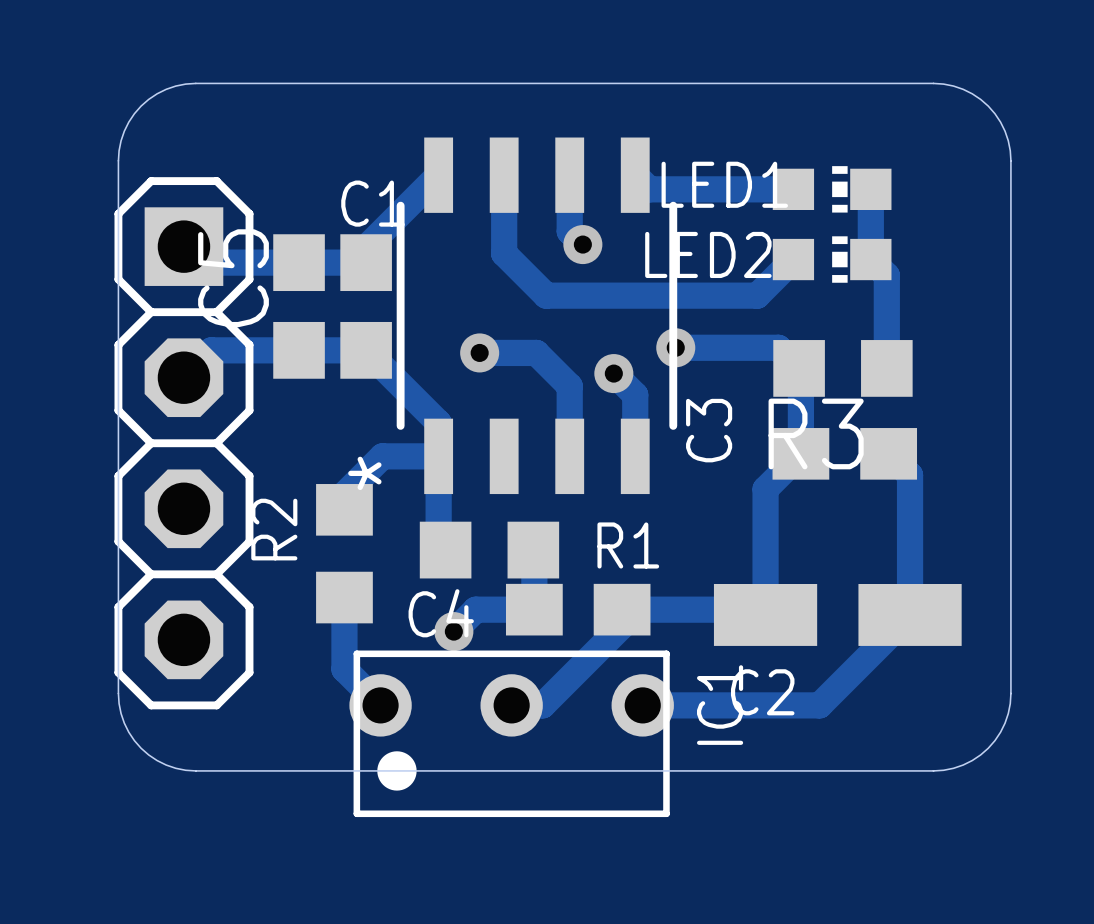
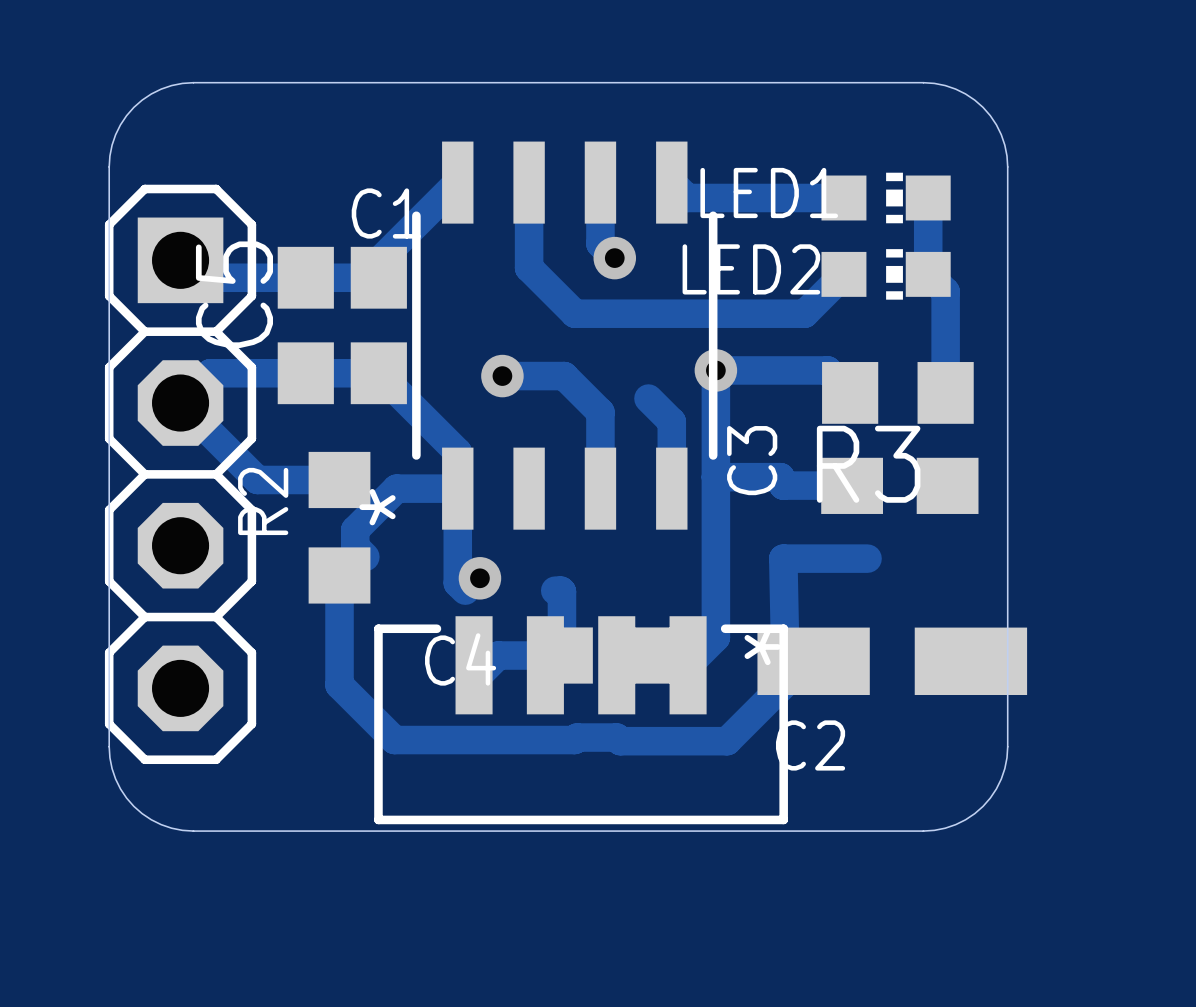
board edge: (866, 83) (943, 84) (972, 93) (988, 106) (1000, 122) (1008, 140) (1010, 160) (1010, 693) (1008, 713) (1000, 732) (988, 748) (963, 765) (933, 770) (866, 770) -> (923, 82) (955, 89) (983, 107) (1001, 134) (1007, 166) (1006, 757) (1001, 779) (983, 806) (955, 824) (923, 831)
track: none -> (715, 370) (715, 637) (688, 665)
track: (800, 370) (800, 453) (765, 489) (765, 614) (760, 609) (622, 609) (622, 625) (542, 705) (511, 705) -> none
via: (613, 373) -> none
track: none -> (180, 403) (257, 479) (339, 479)
track: none -> (715, 477) (780, 477) (783, 485) (867, 485)
track: (888, 453) (910, 475) (910, 614) (819, 705) (642, 705) -> none
track: none -> (867, 558) (783, 558) (785, 682) (727, 741) (620, 741) (616, 737) (577, 737) (574, 740) (394, 740) (339, 685) (339, 575)
R1: (489, 550) -> none
R2 position: (344, 553) -> (339, 527)
track: (344, 597) (344, 669) (380, 705) -> none
via position: (453, 631) -> (479, 578)
part: none -> (581, 720)
IC1: (511, 733) -> none

